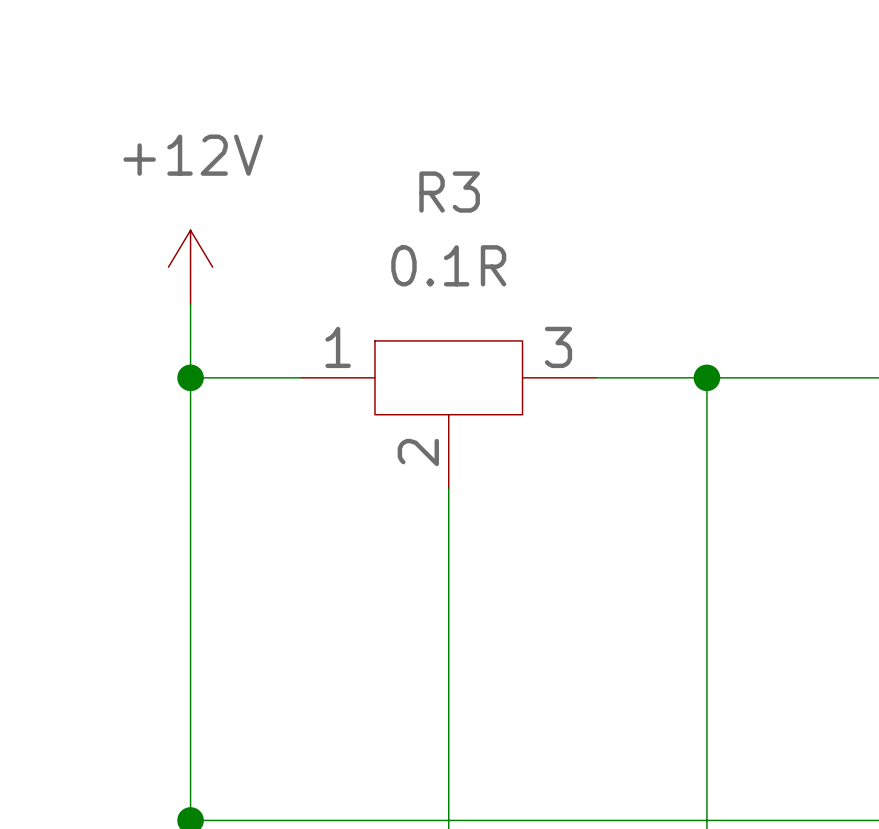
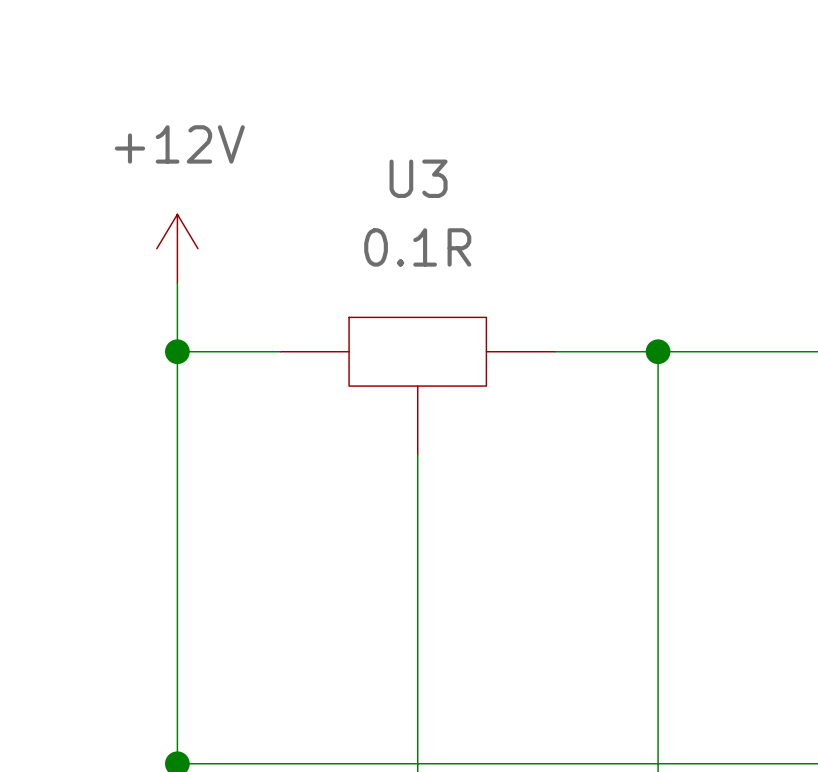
R3 name: R3 (449, 192) -> U3 (418, 178)
R3 pin number: 1 (338, 347) -> none
R3 pin number: 3 (558, 347) -> none
R3 pin number: 2 (418, 452) -> none

